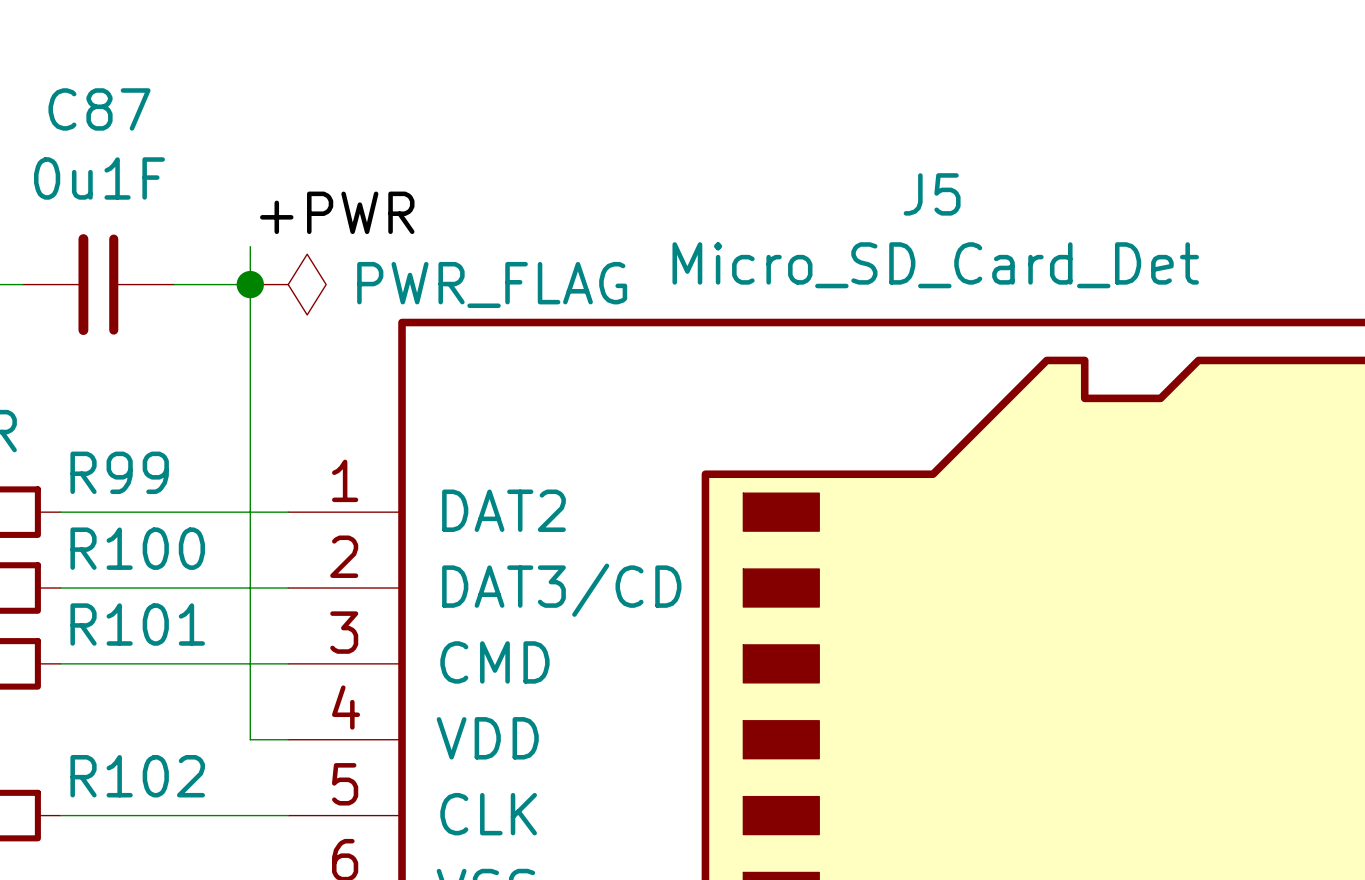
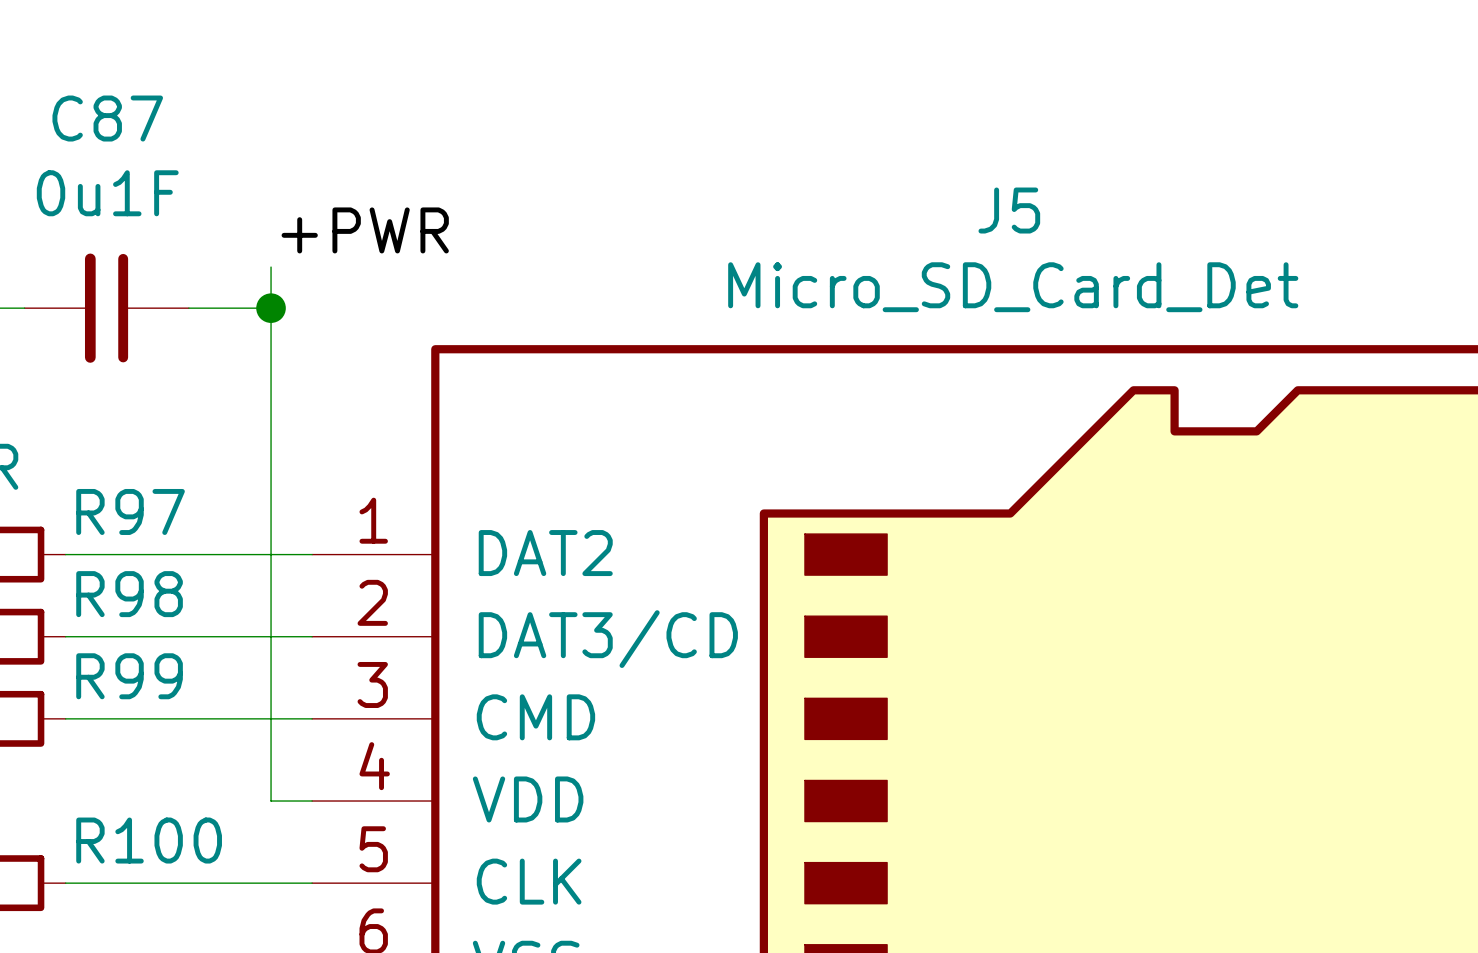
power symbol: PWR_FLAG (288, 284) -> none
R99 name: R99 (119, 472) -> R97 (130, 511)
R100 name: R100 (137, 548) -> R98 (129, 594)
R101 name: R101 (137, 624) -> R99 (129, 676)
R102 name: R102 (137, 776) -> R100 (149, 840)

